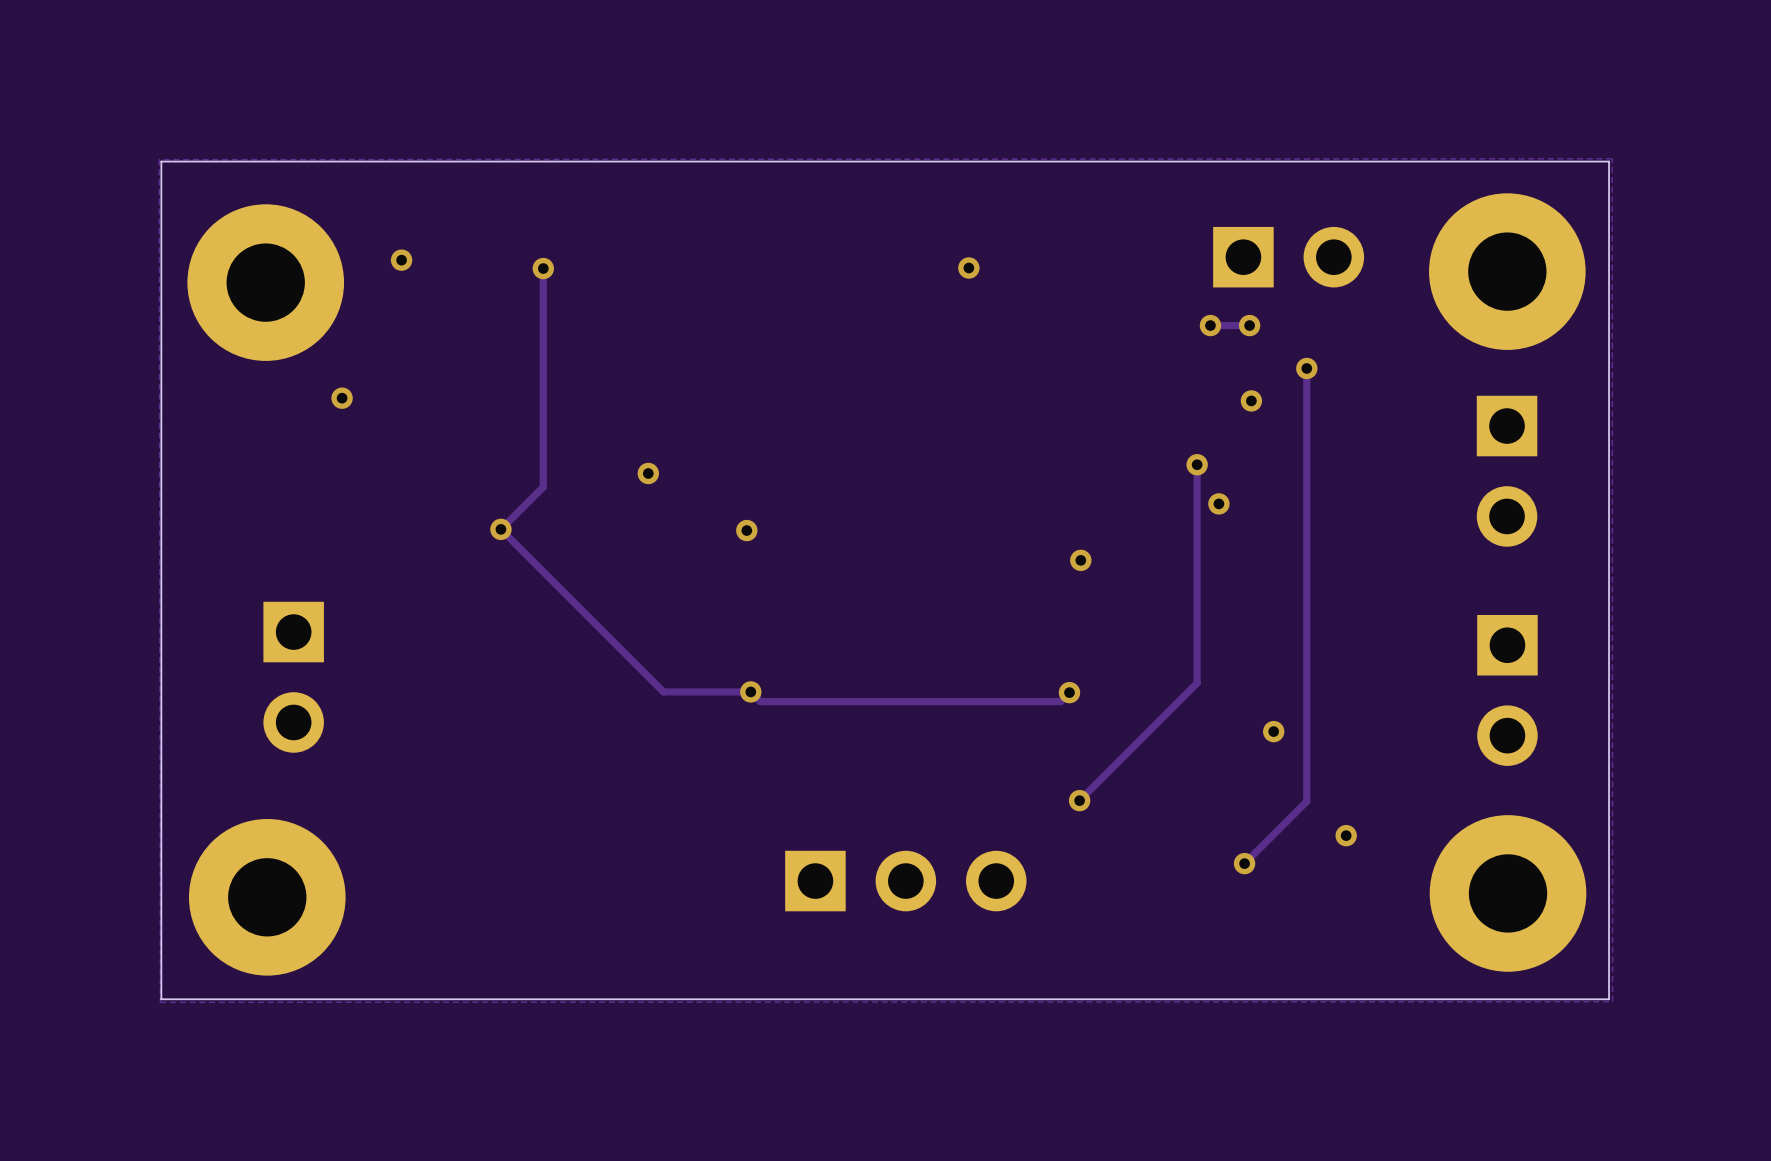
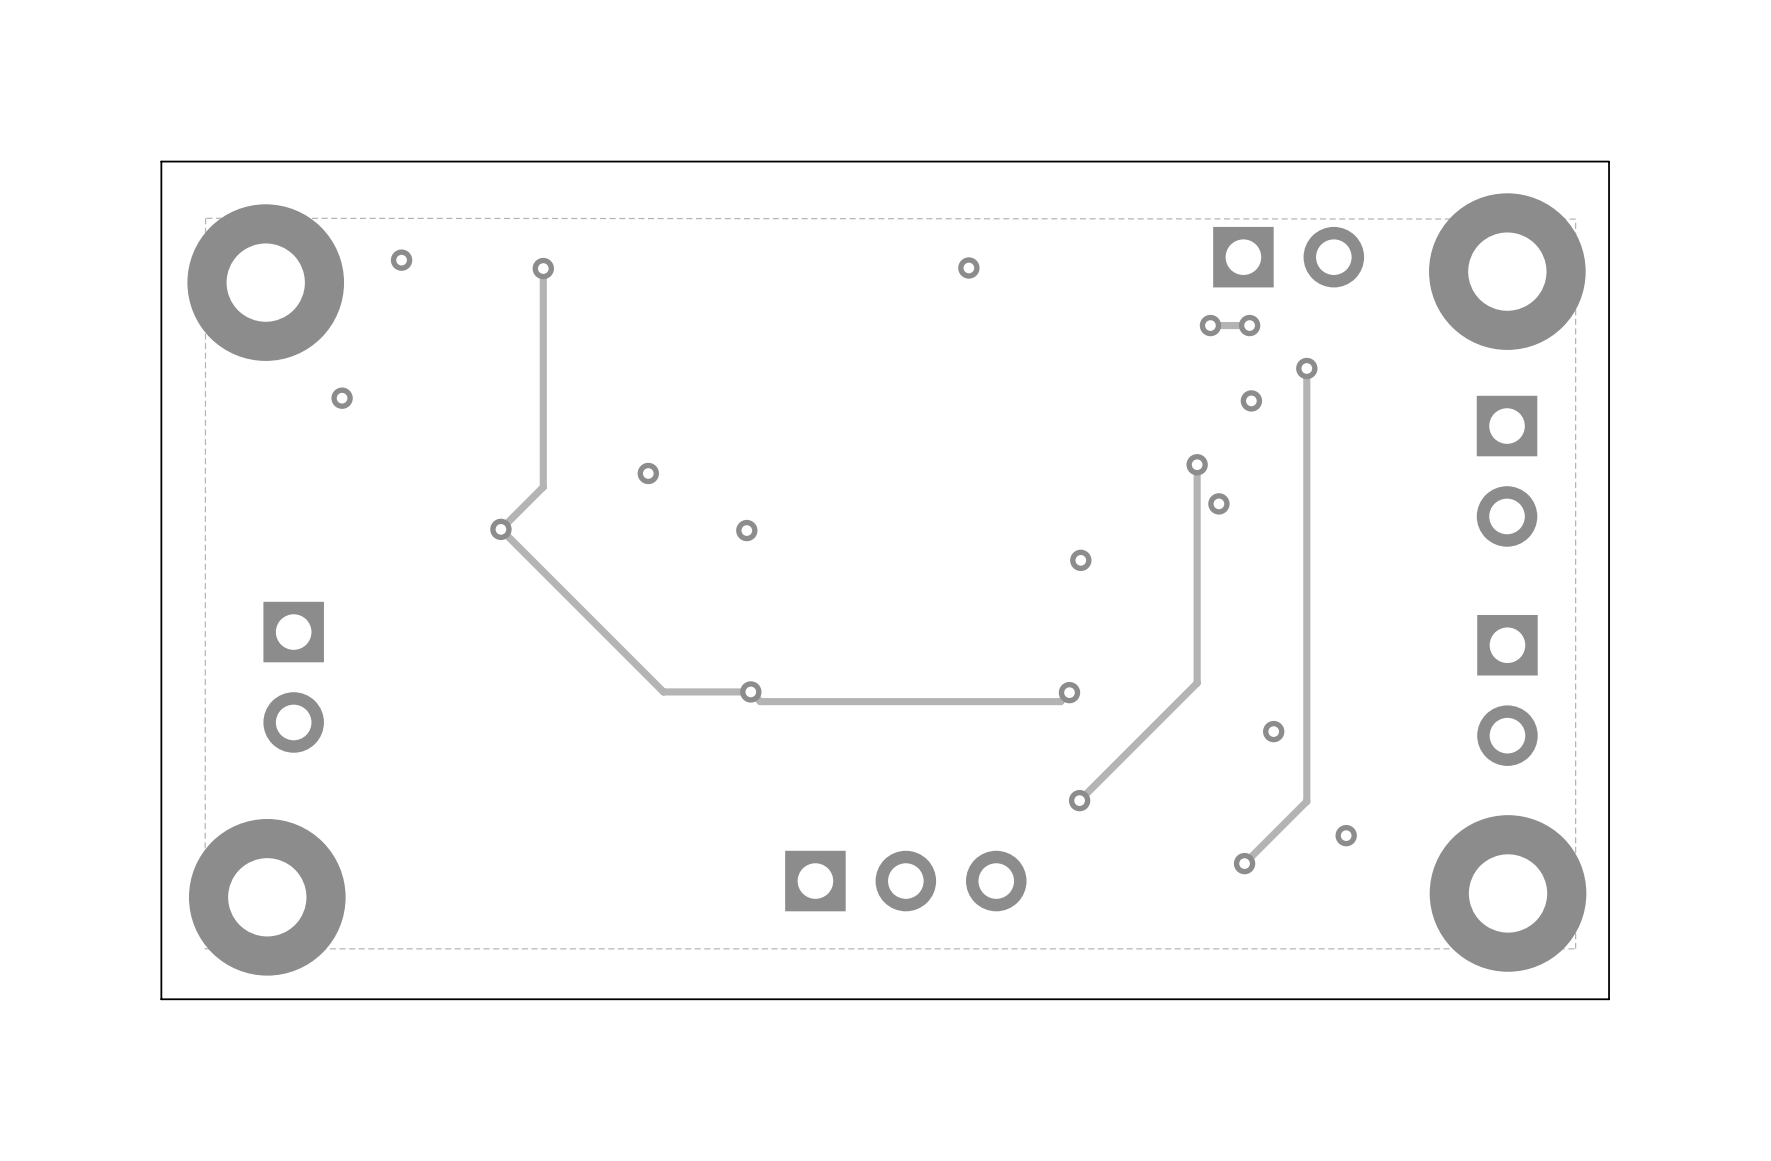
zone outline: (1612, 158) (159, 159) (160, 1002) (1612, 1001) (1612, 158) -> (205, 218) (1575, 219) (1575, 948) (205, 948) (205, 218)

